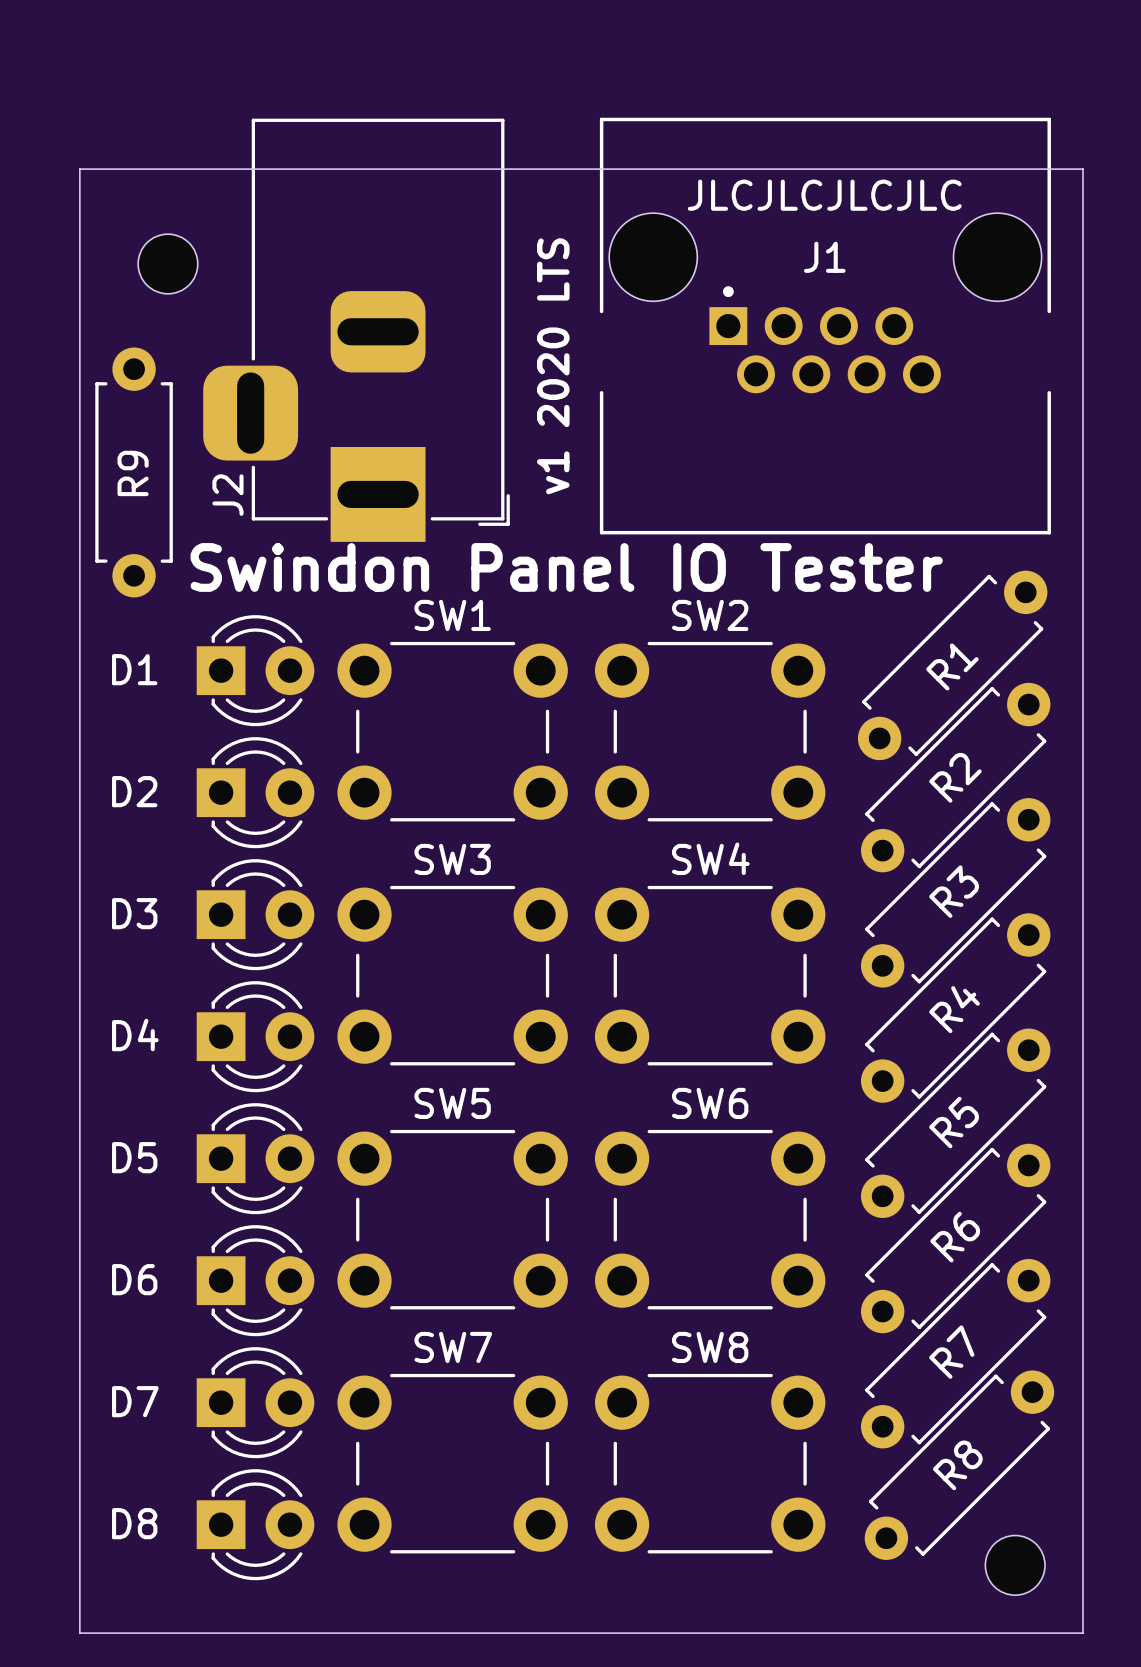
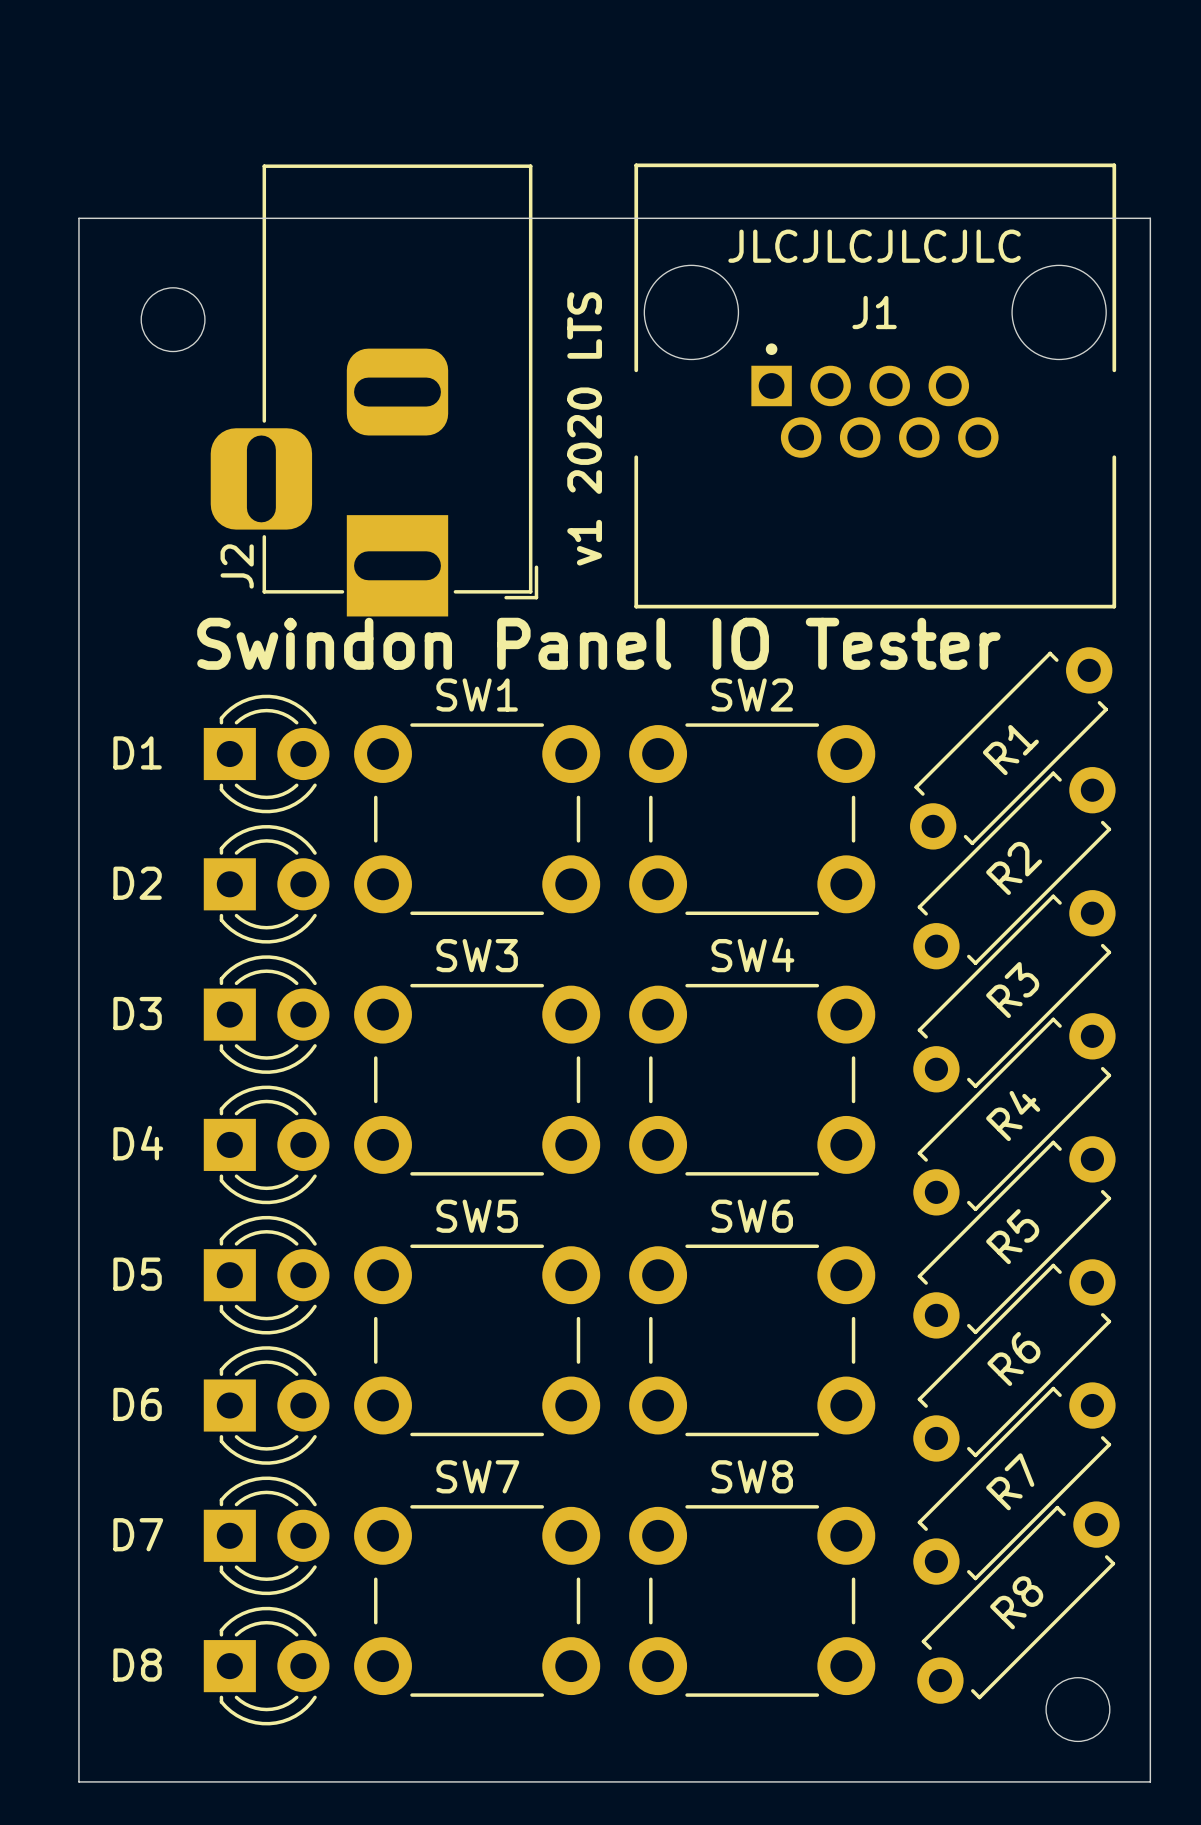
R9: (134, 472) -> none

